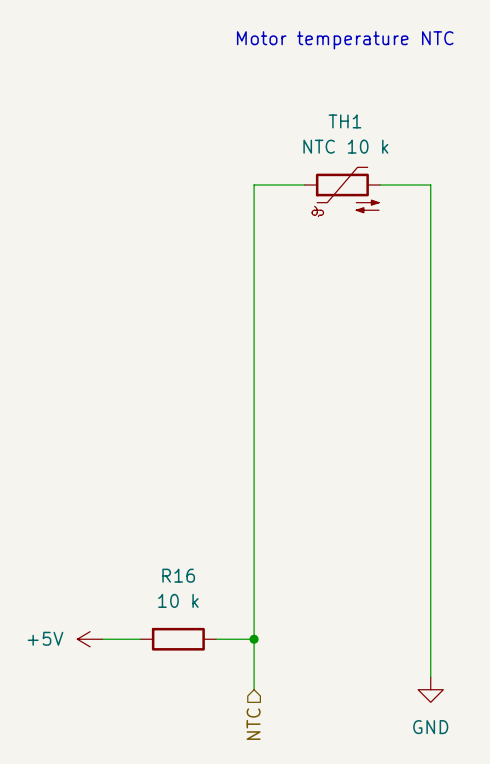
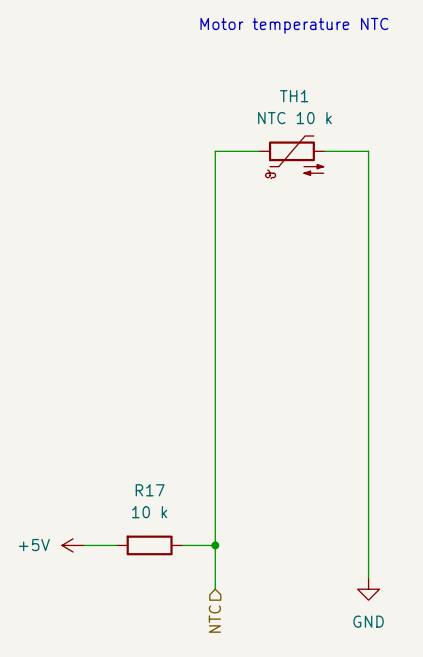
R16 name: R16 (178, 575) -> R17 (150, 490)

